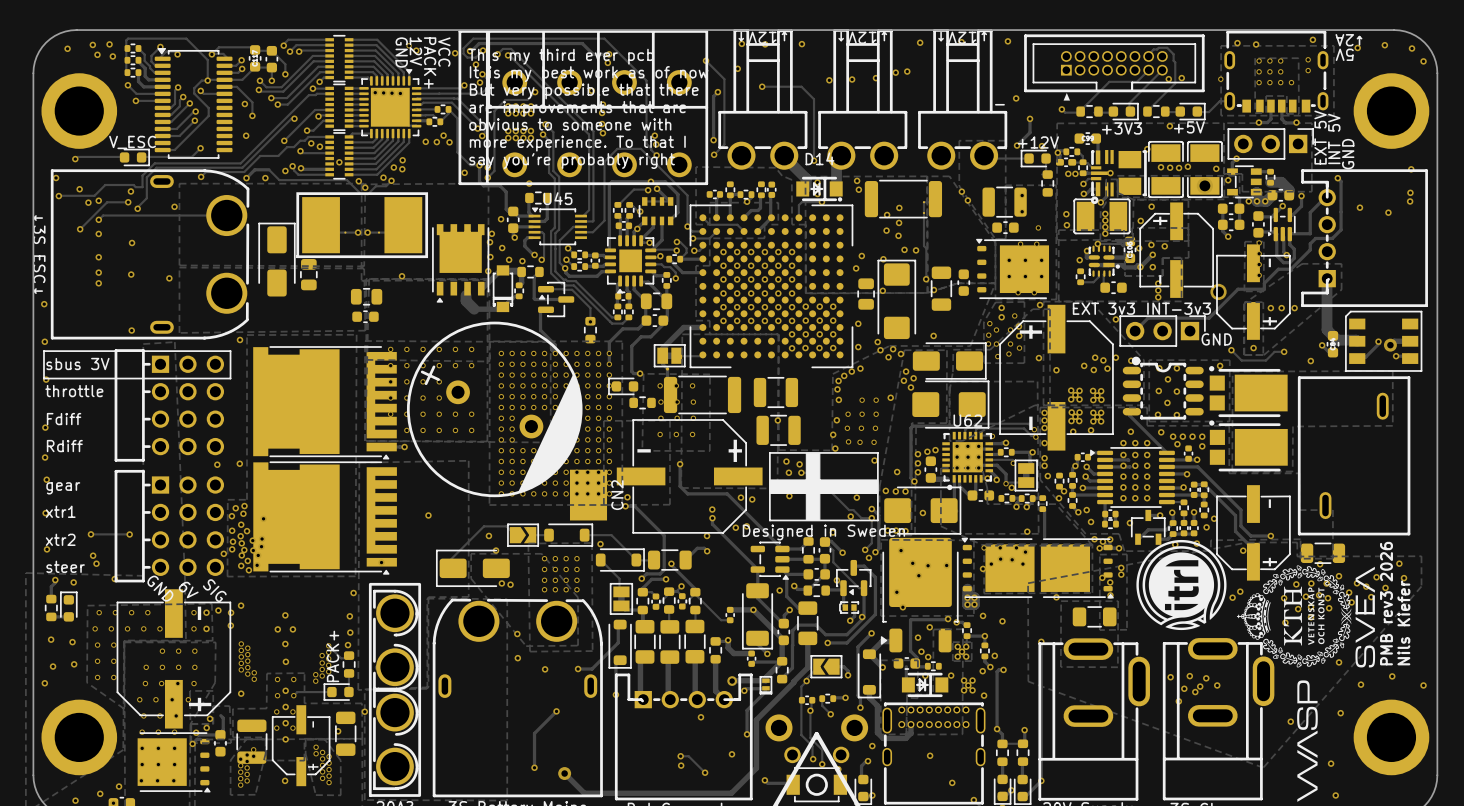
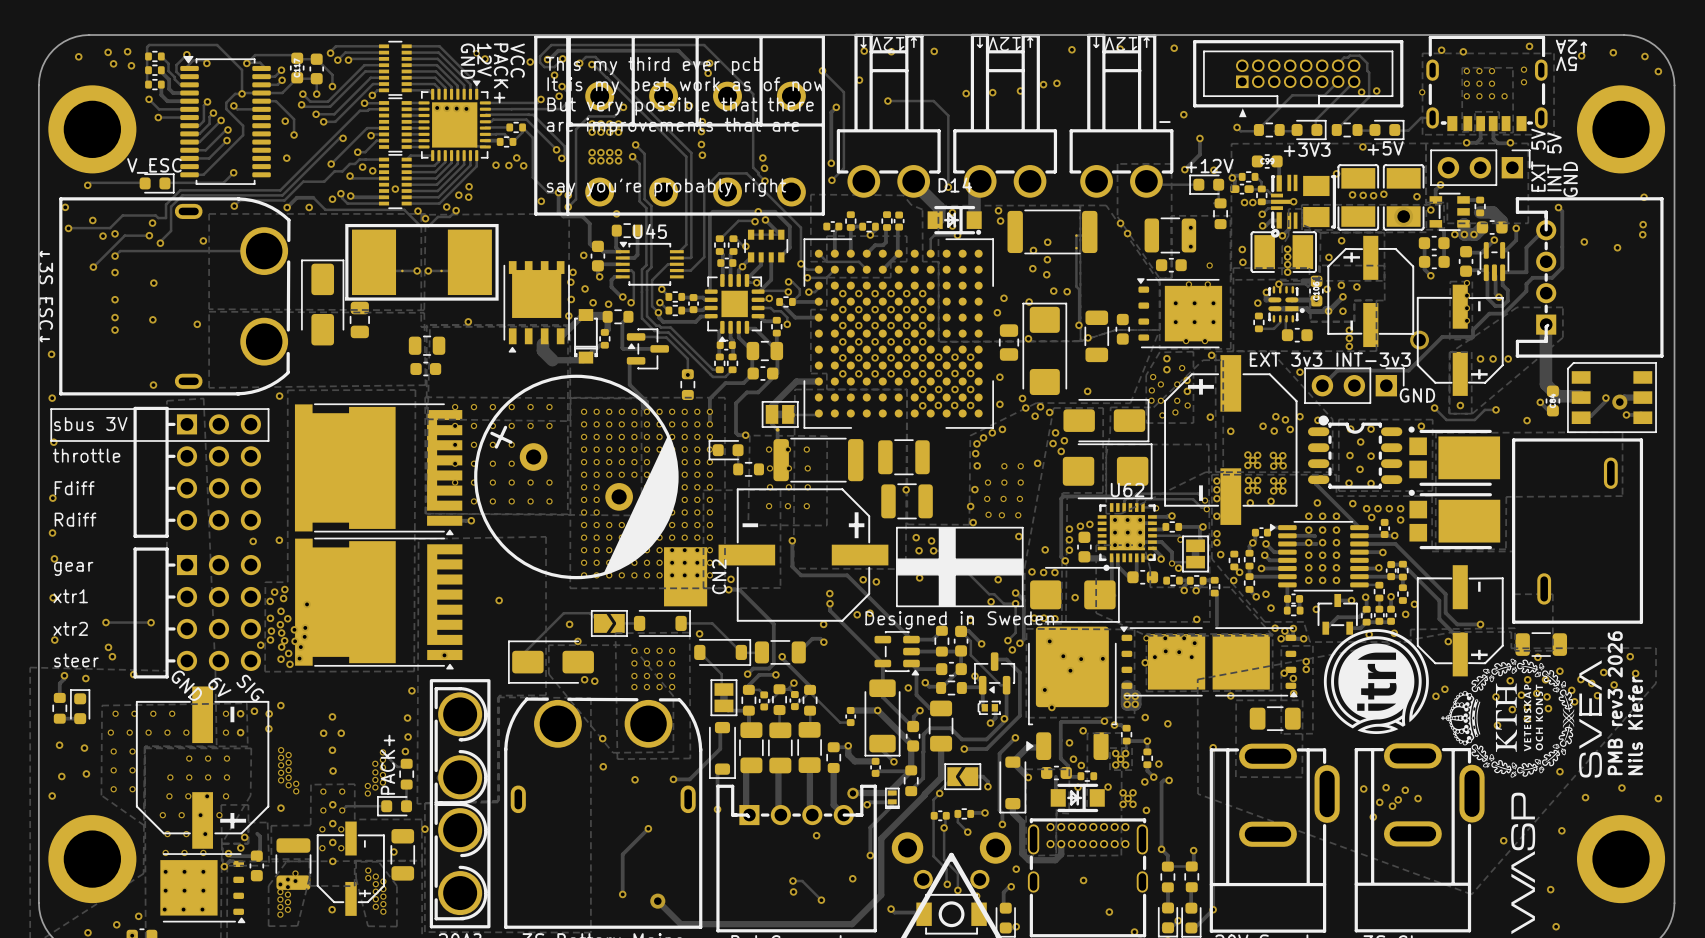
text: obvious to someone with (570, 124) -> none
text: more experience. To that I (577, 143) -> none

